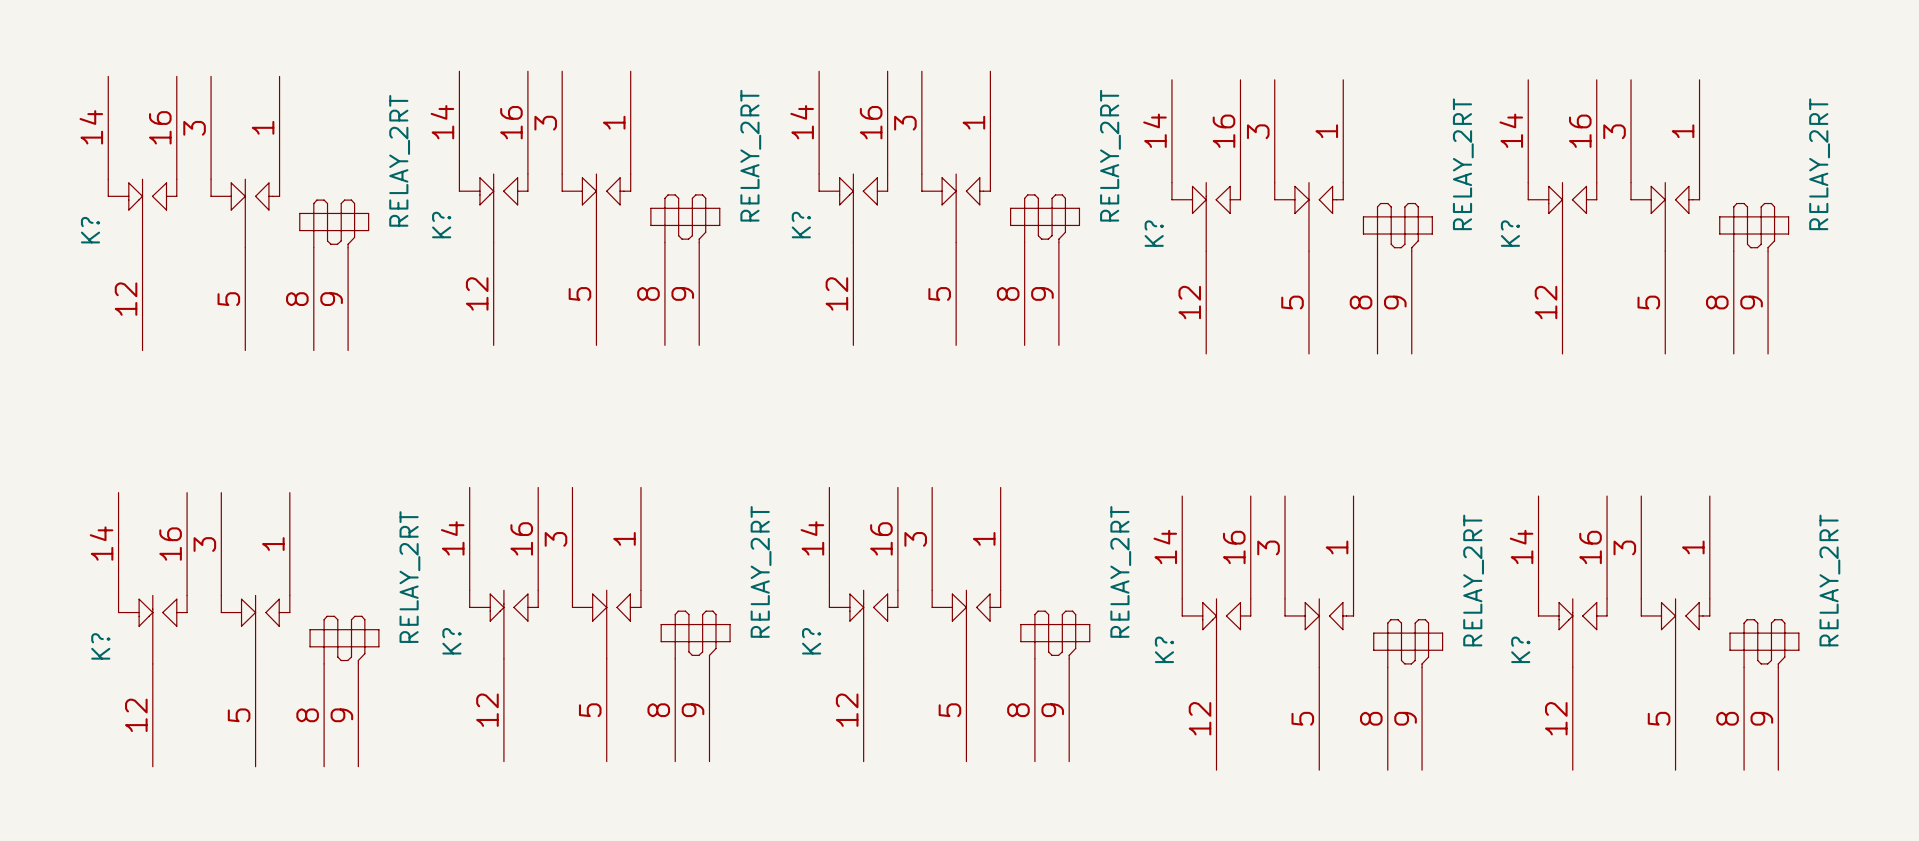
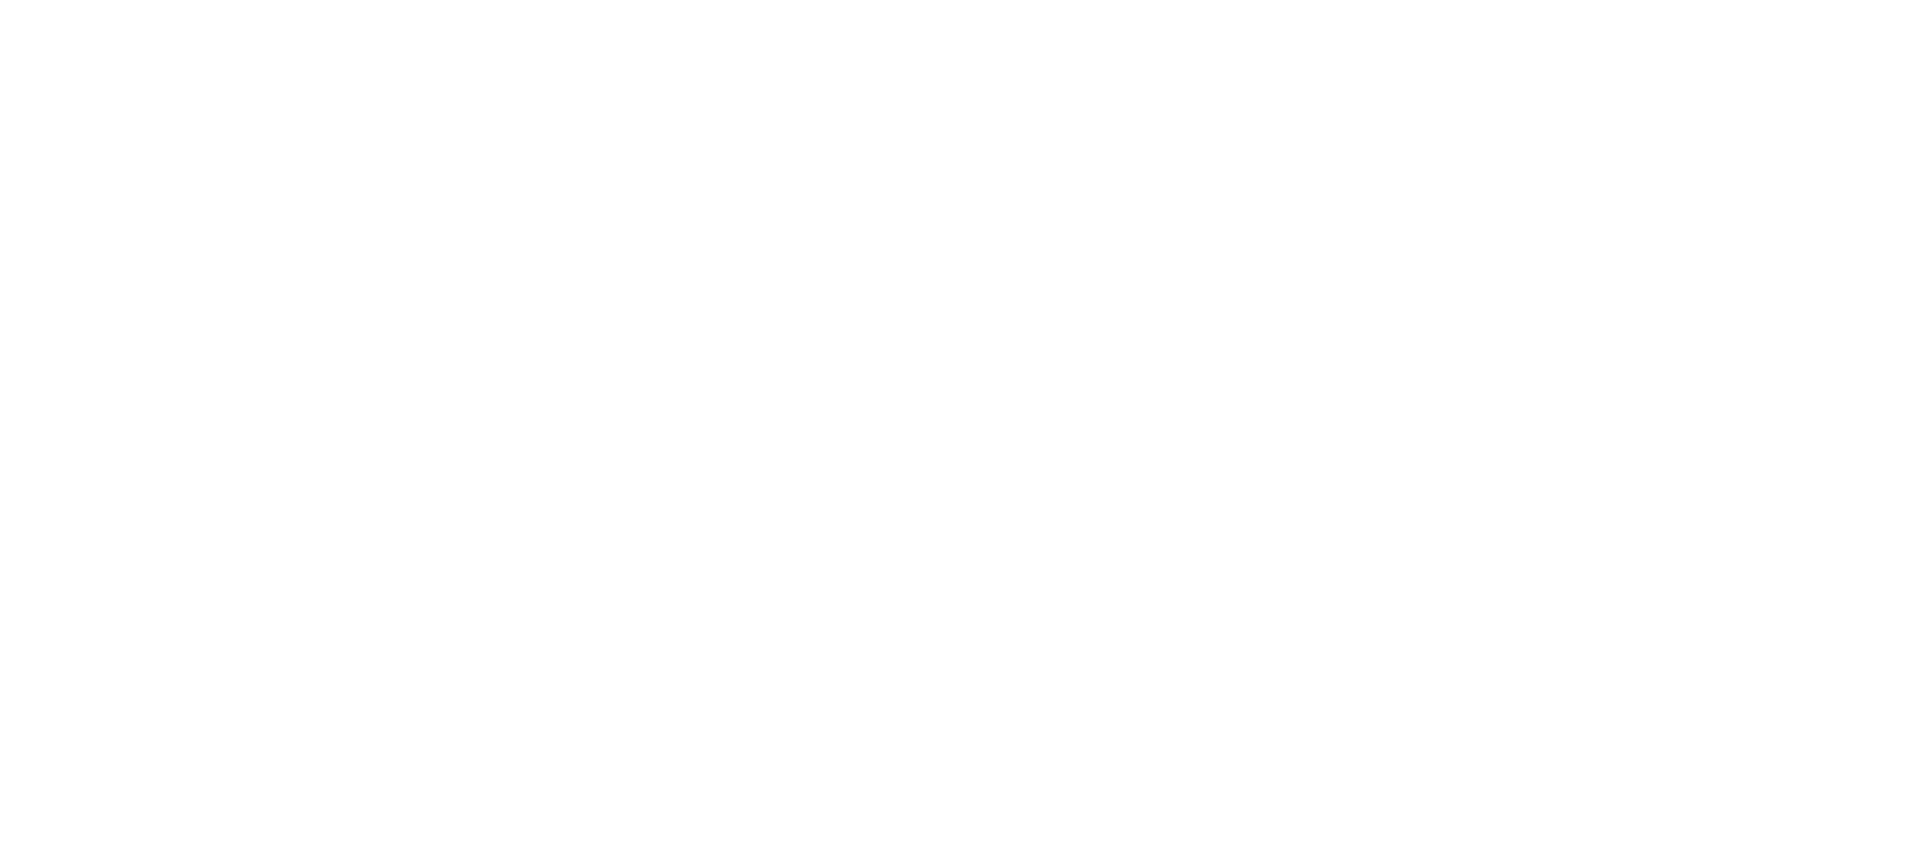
K?: RELAY_2RT (589, 208) -> none
K?: RELAY_2RT (949, 208) -> none
K?: RELAY_2RT (238, 213) -> none
K?: RELAY_2RT (1302, 216) -> none
K?: RELAY_2RT (1658, 216) -> none
K?: RELAY_2RT (599, 624) -> none
K?: RELAY_2RT (959, 624) -> none
K?: RELAY_2RT (248, 629) -> none
K?: RELAY_2RT (1312, 633) -> none
K?: RELAY_2RT (1668, 633) -> none

